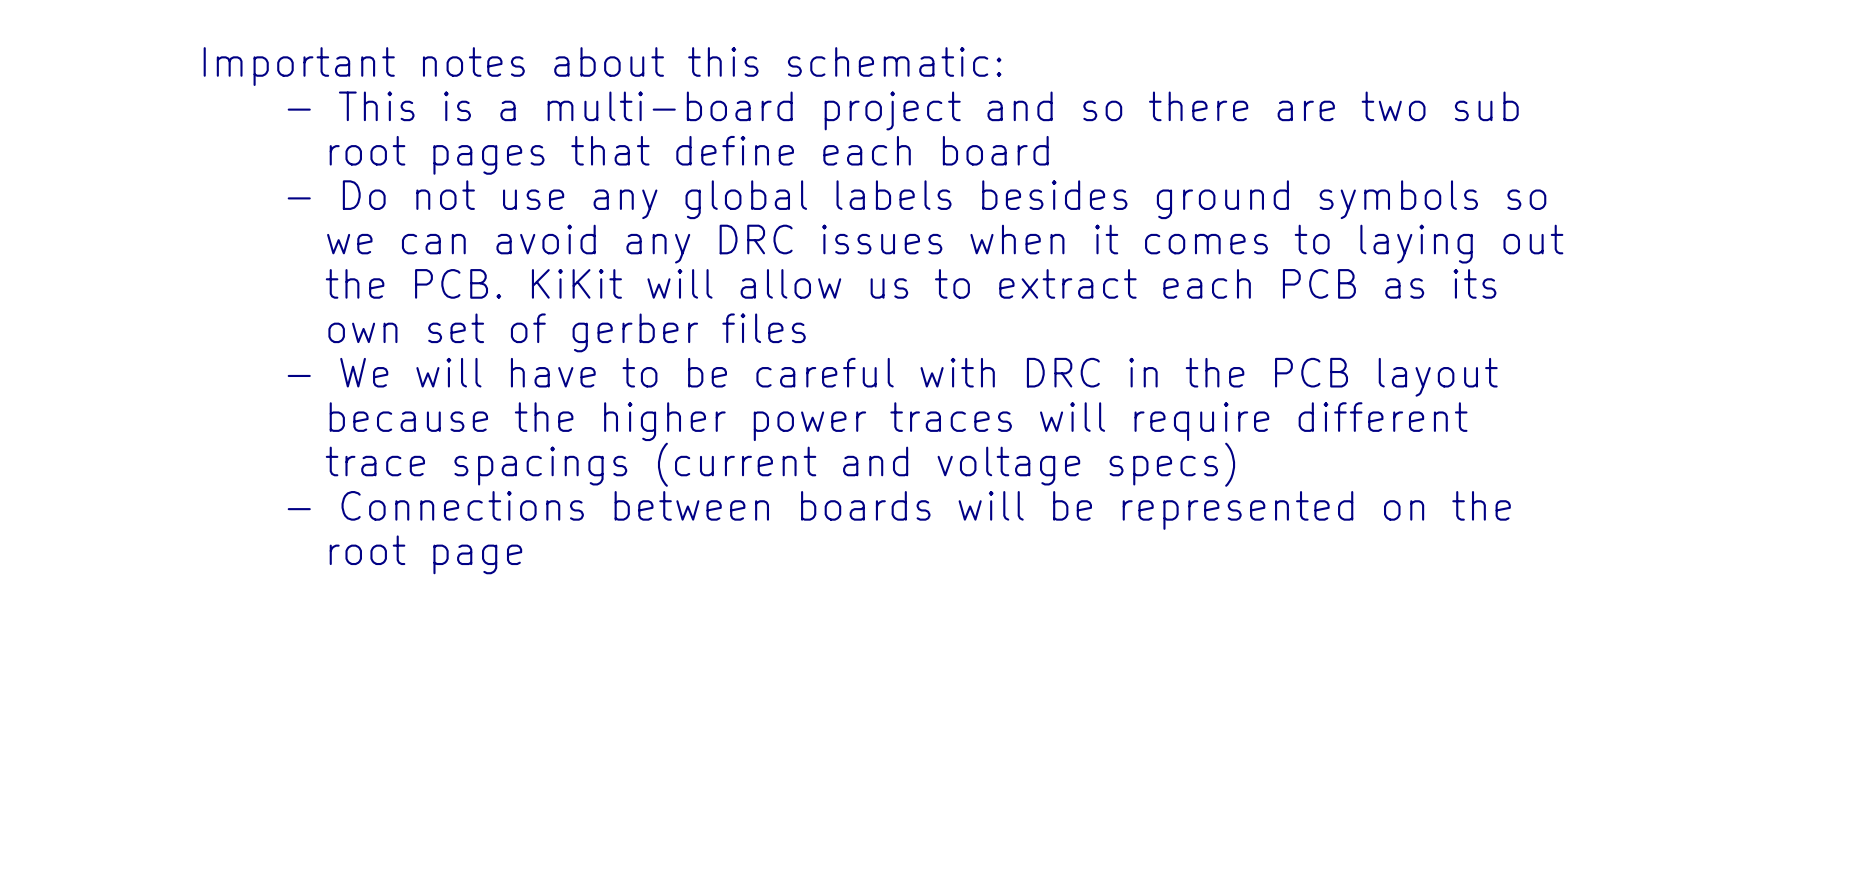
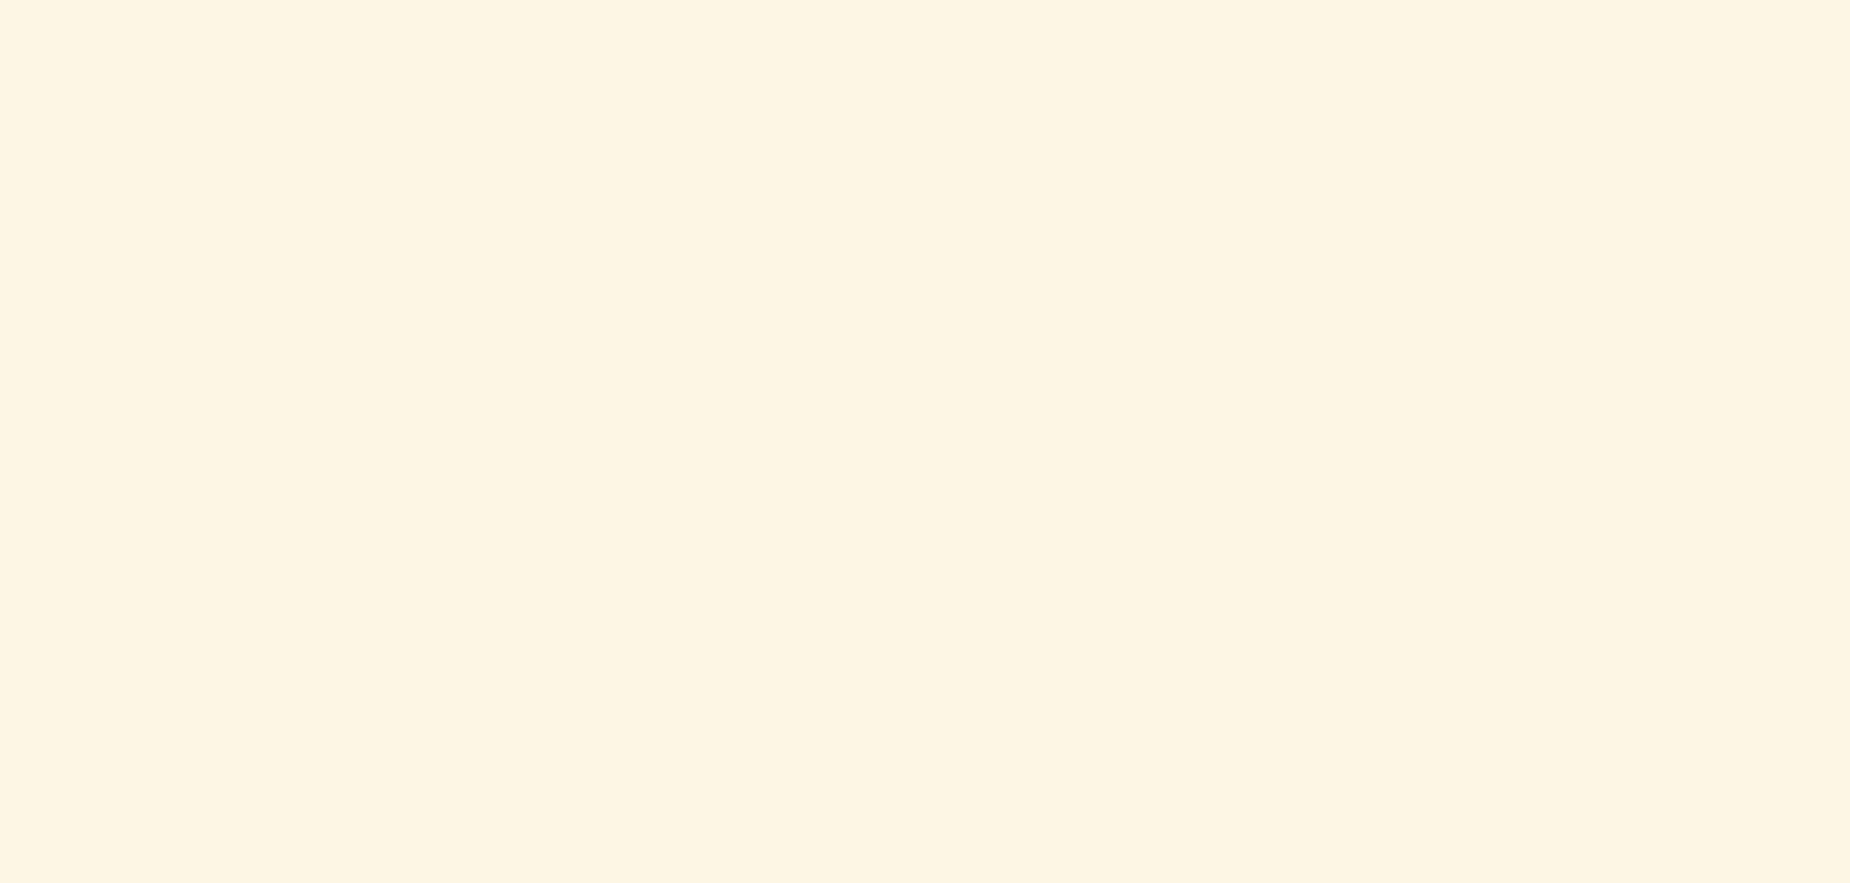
text: Important notes about this schematic: (602, 66) -> none
text: - This is a multi-board project and so there are two sub (903, 110) -> none
text: root pages that define each board (689, 155) -> none
text: - Do not use any global labels besides ground symbols so (916, 199) -> none
text: we can avoid any DRC issues when it comes to laying out (945, 244) -> none
text: the PCB. KiKit will allow us to extract each PCB as its (911, 283) -> none
text: own set of gerber files (567, 332) -> none
text: - We will have to be careful with DRC in the PCB layout (892, 377) -> none
text: because the higher power traces will require different (898, 421) -> none
text: trace spacings (current and voltage specs) (780, 464) -> none
text: - Connections between boards will be represented on the (899, 510) -> none
text: root page (425, 554) -> none

